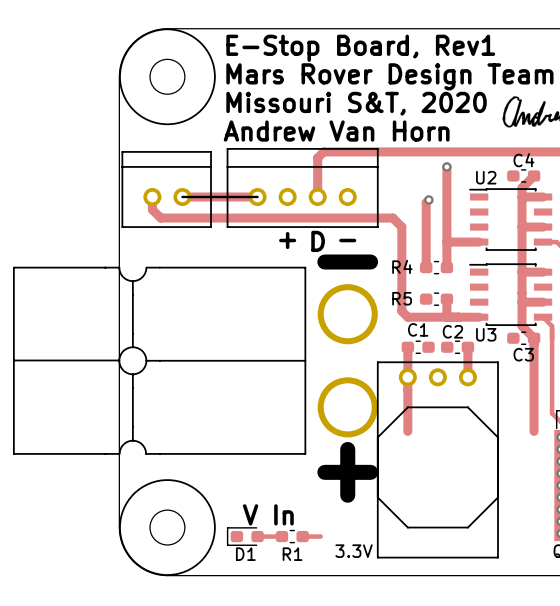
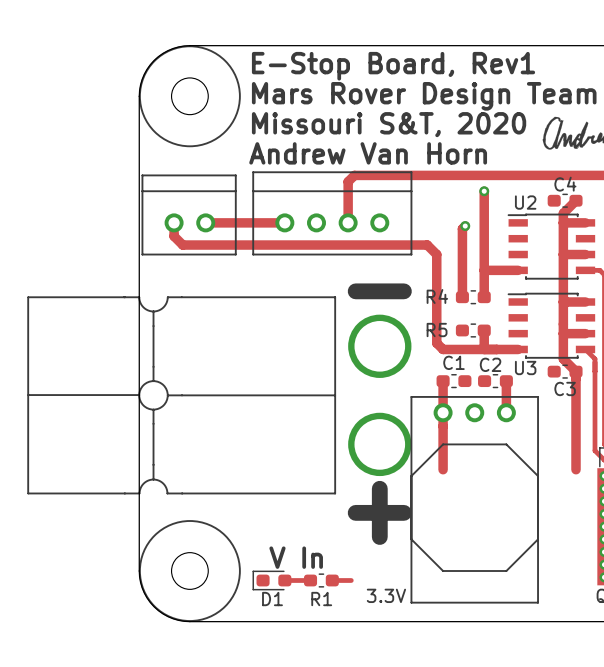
line: (182, 197) (257, 197) -> none
text: + (287, 240) -> none
text: - (347, 240) -> none
text: D (318, 241) -> none

